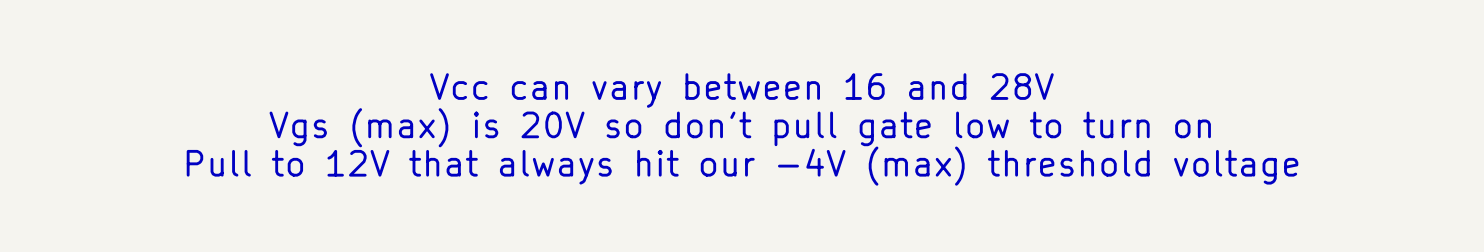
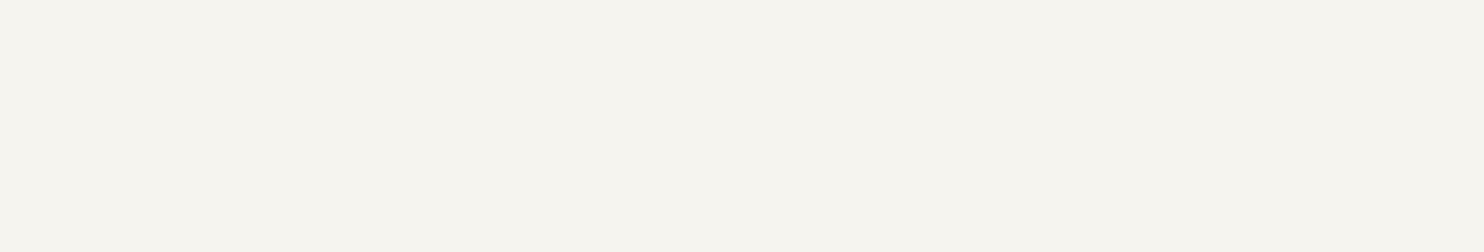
text: Vcc can vary between 16 and 28V (741, 90) -> none
text: Vgs (max) is 20V so don't pull gate low to turn on (740, 127) -> none
text: Pull to 12V that always hit our -4V (max) threshold voltage (742, 166) -> none

